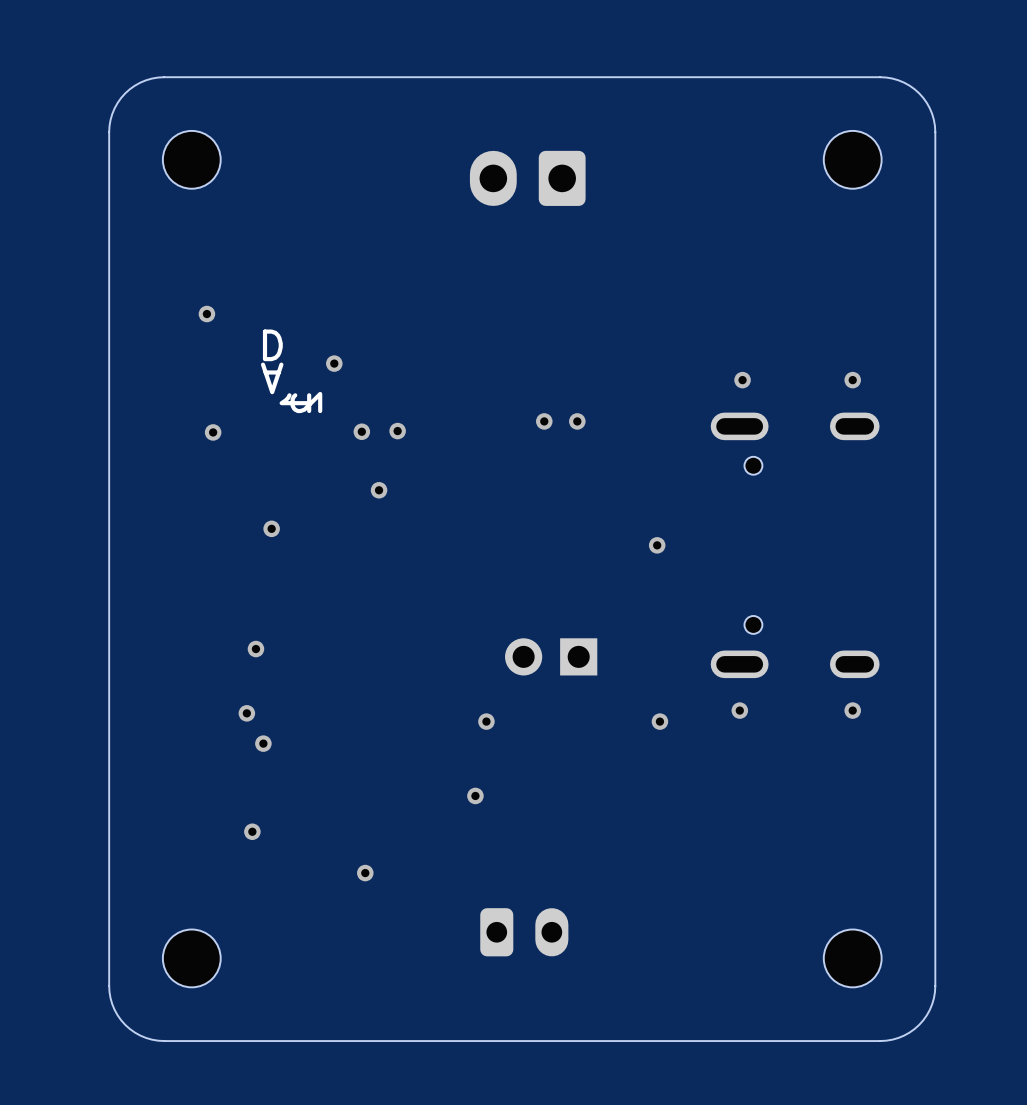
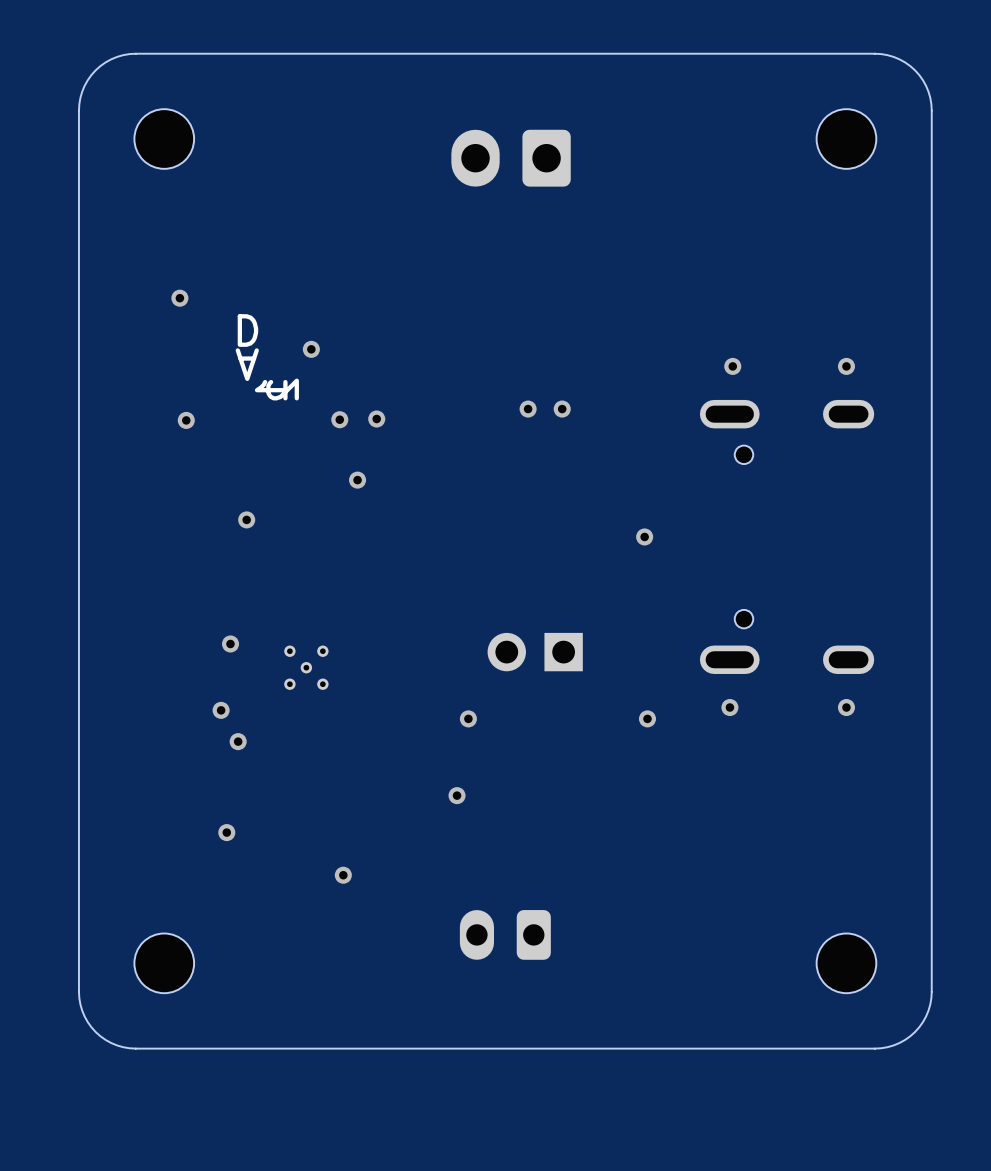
part: none -> (306, 667)
part rotation: 0° (524, 932) -> 180° (505, 934)

